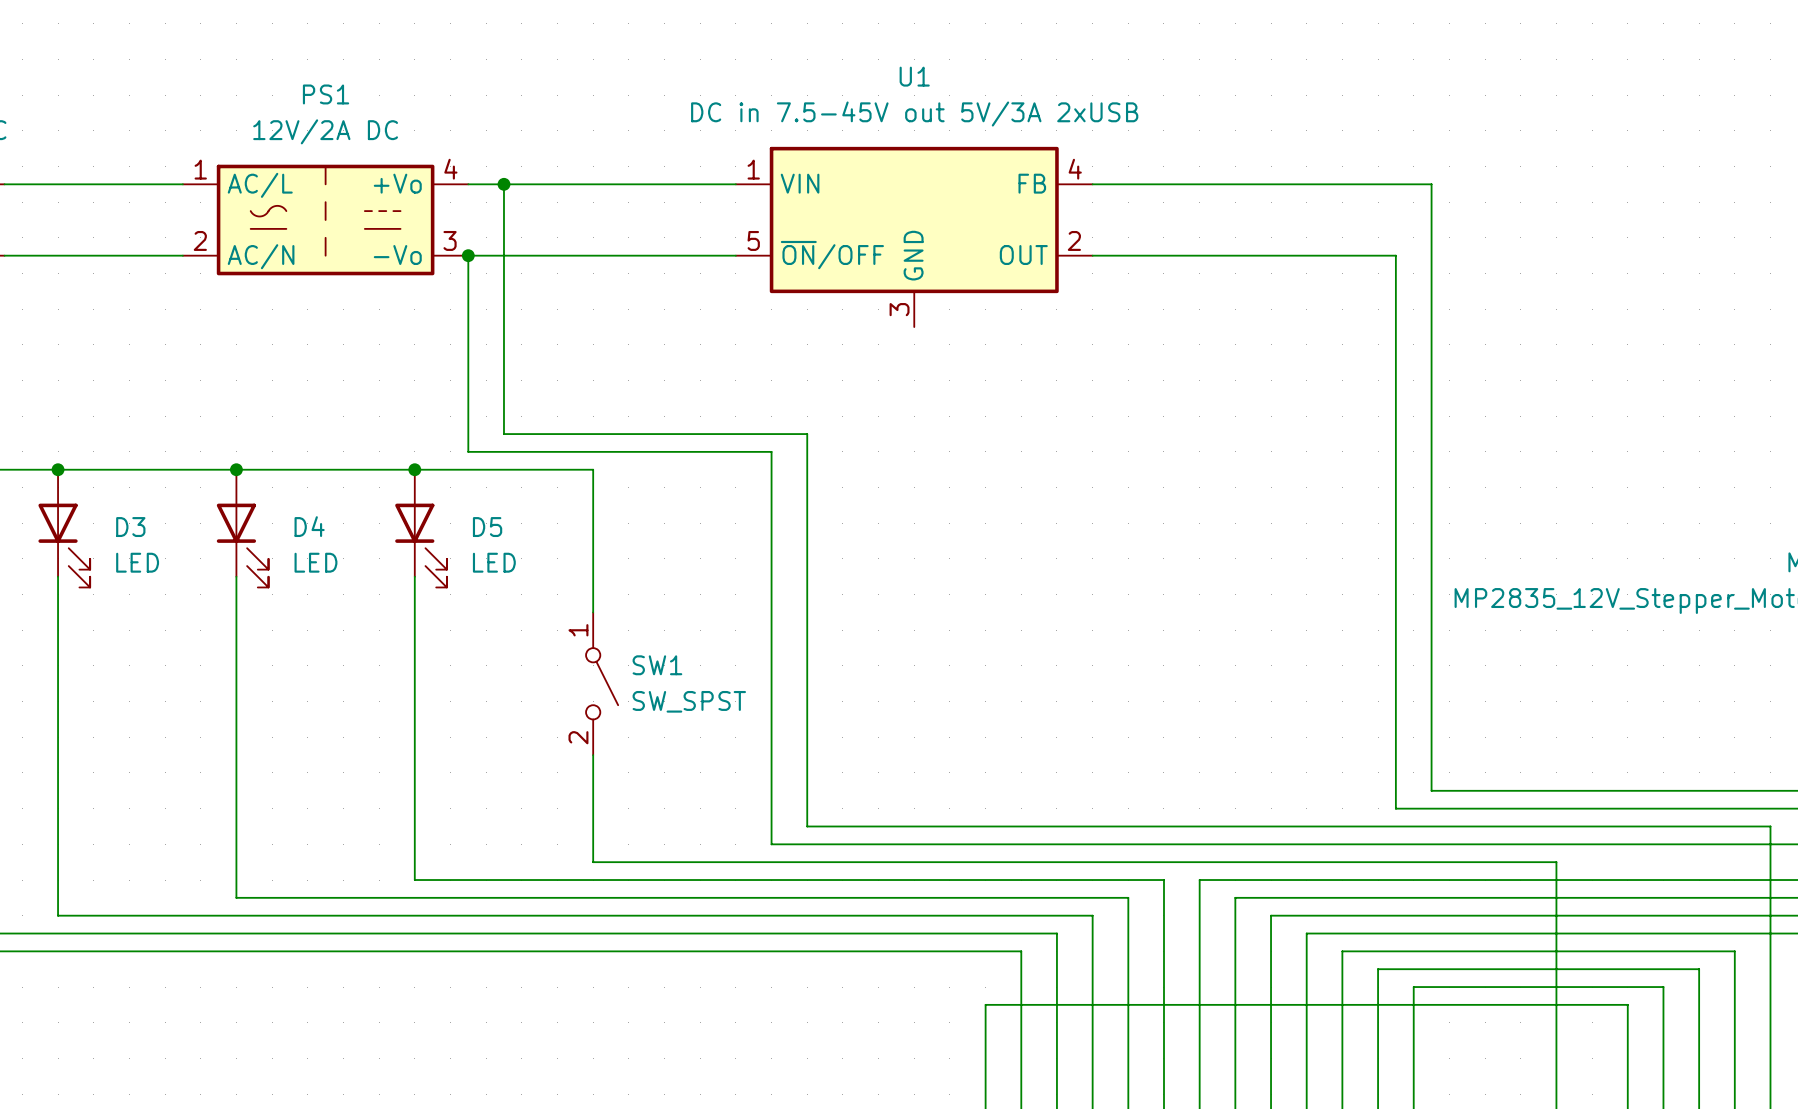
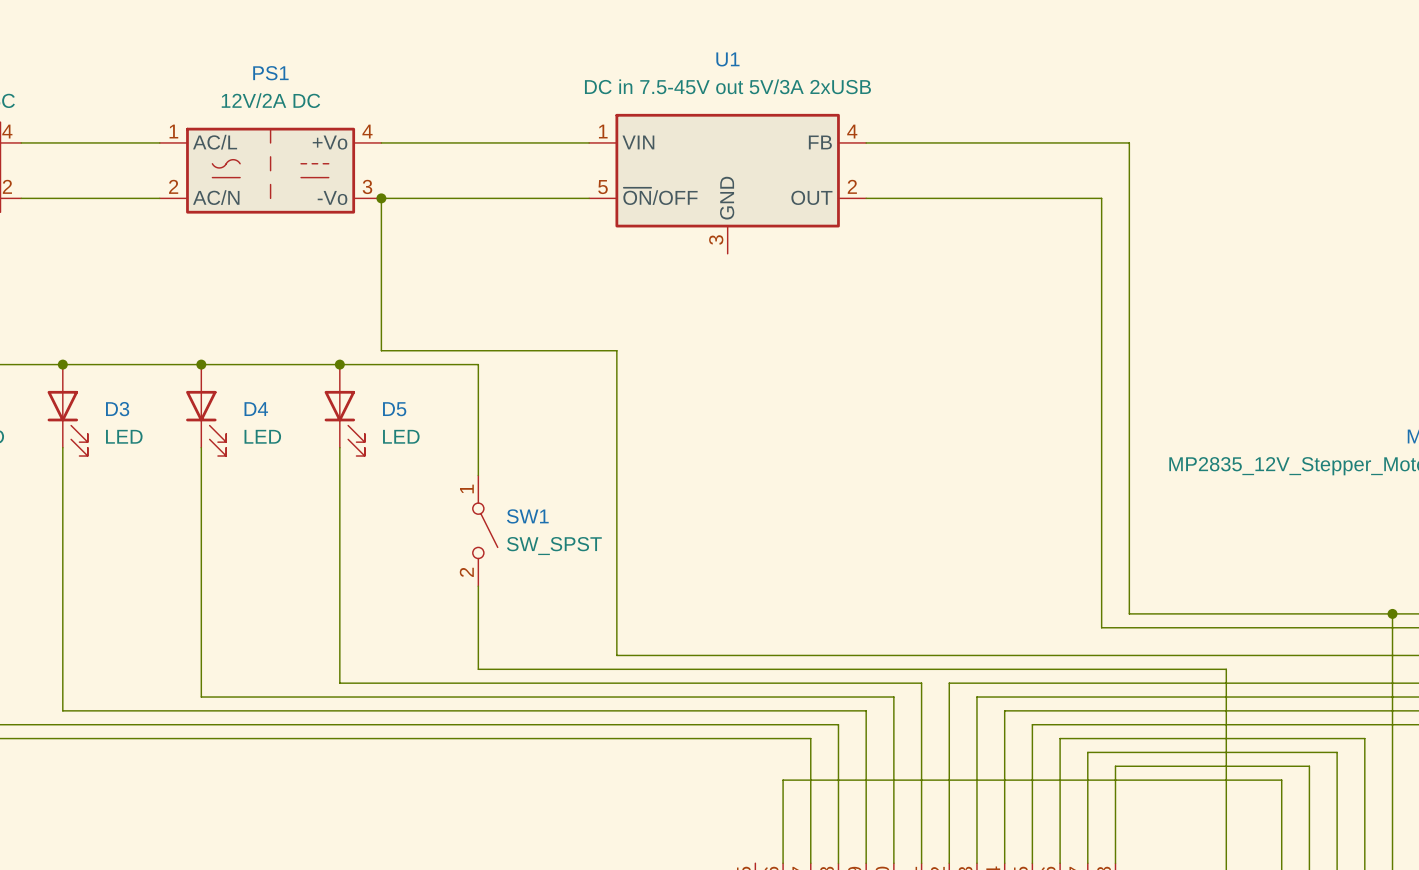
wire: (503, 184) (503, 434) (807, 434) (807, 826) (1770, 826) -> (1392, 613) (1392, 641)
junction: (503, 184) -> none
junction: none -> (1392, 613)

